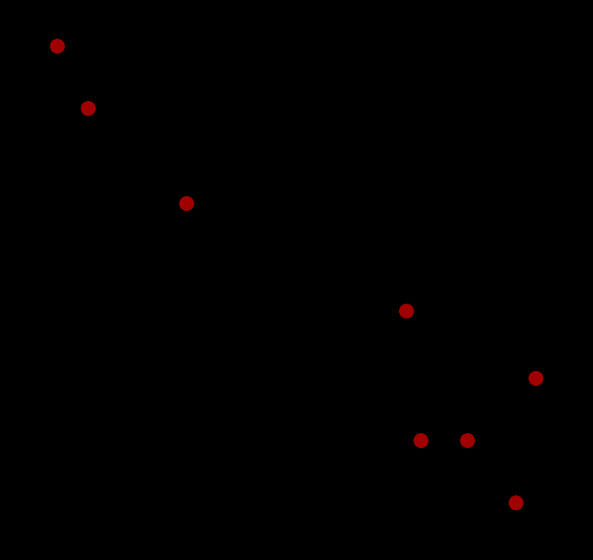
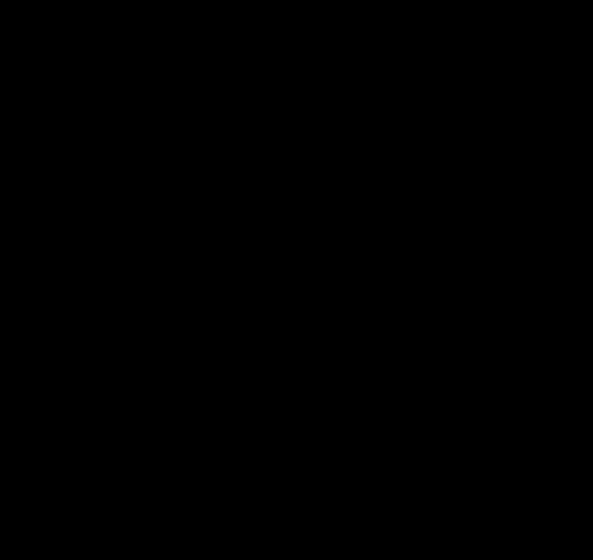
part: (57, 46) -> none
part: (88, 108) -> none
part: (186, 203) -> none
part: (406, 311) -> none
part: (535, 378) -> none
part: (421, 440) -> none
part: (467, 440) -> none
part: (516, 502) -> none

